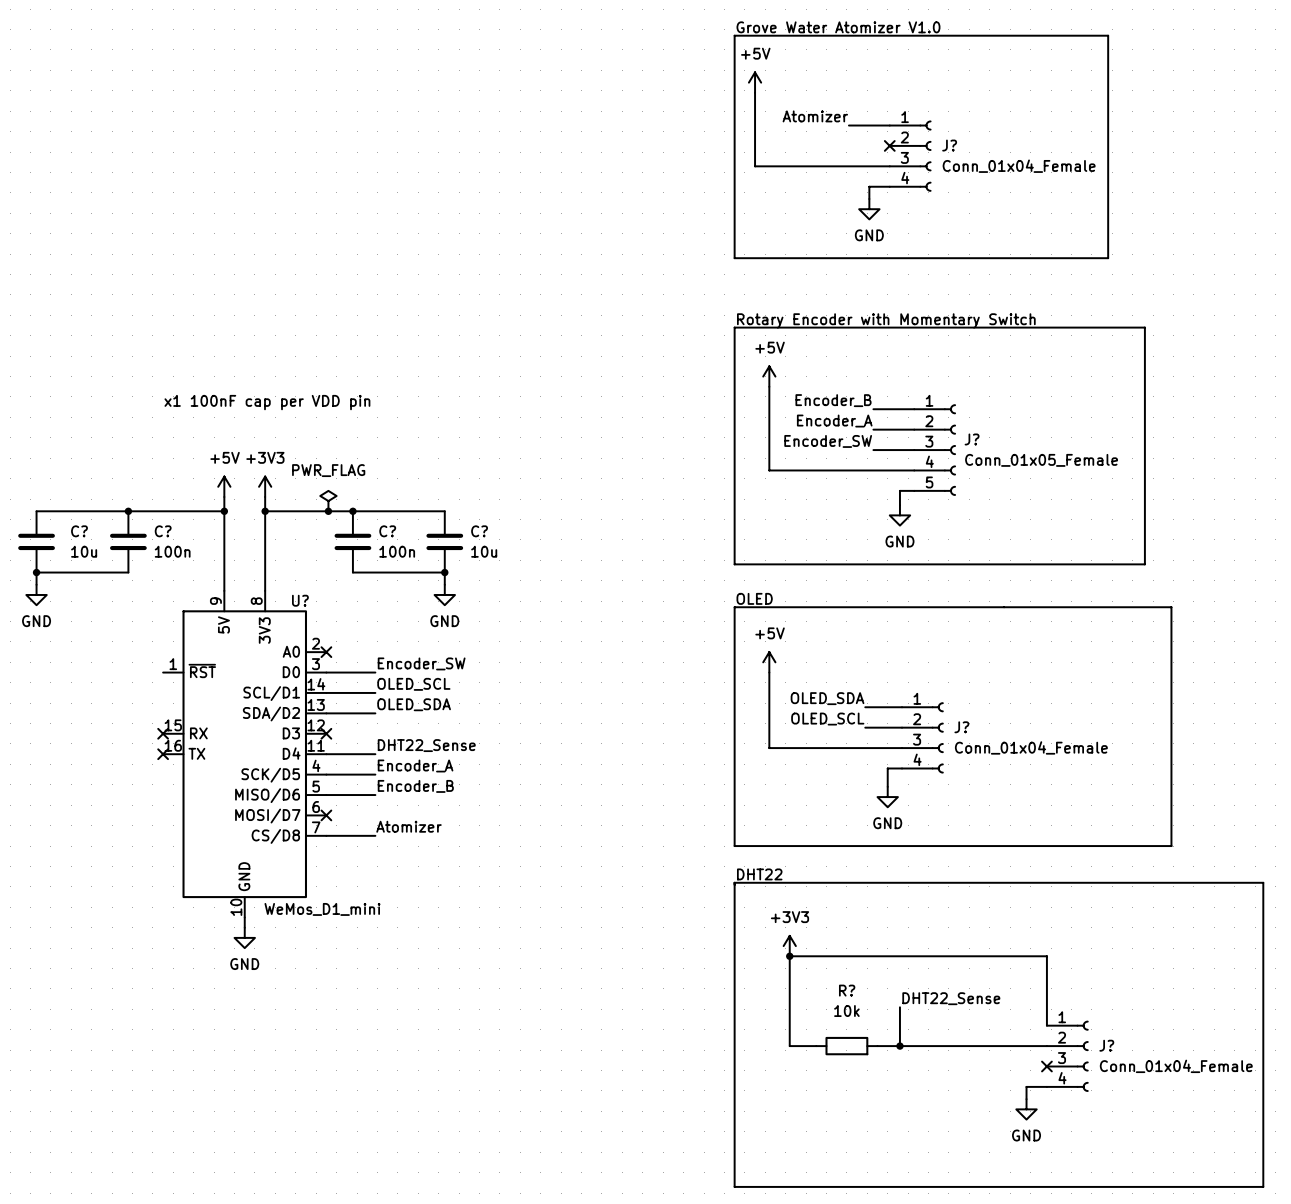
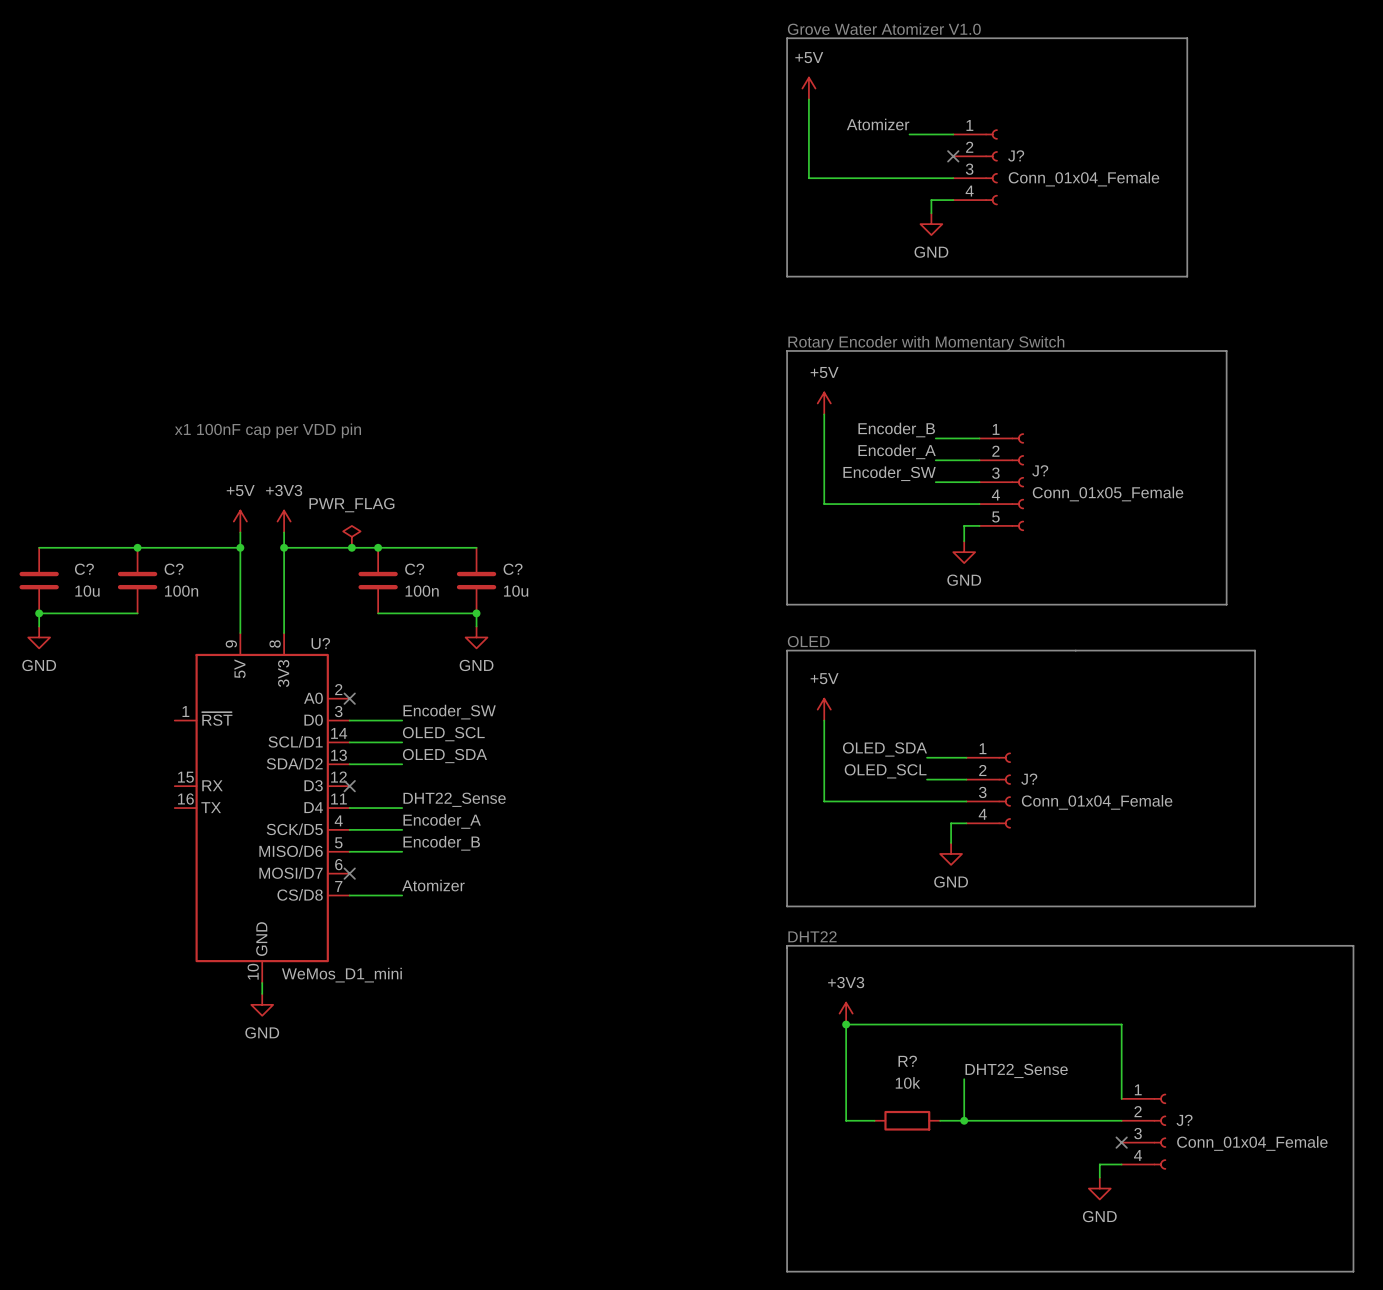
no-connect mark: (163, 733) -> none
no-connect mark: (163, 754) -> none

